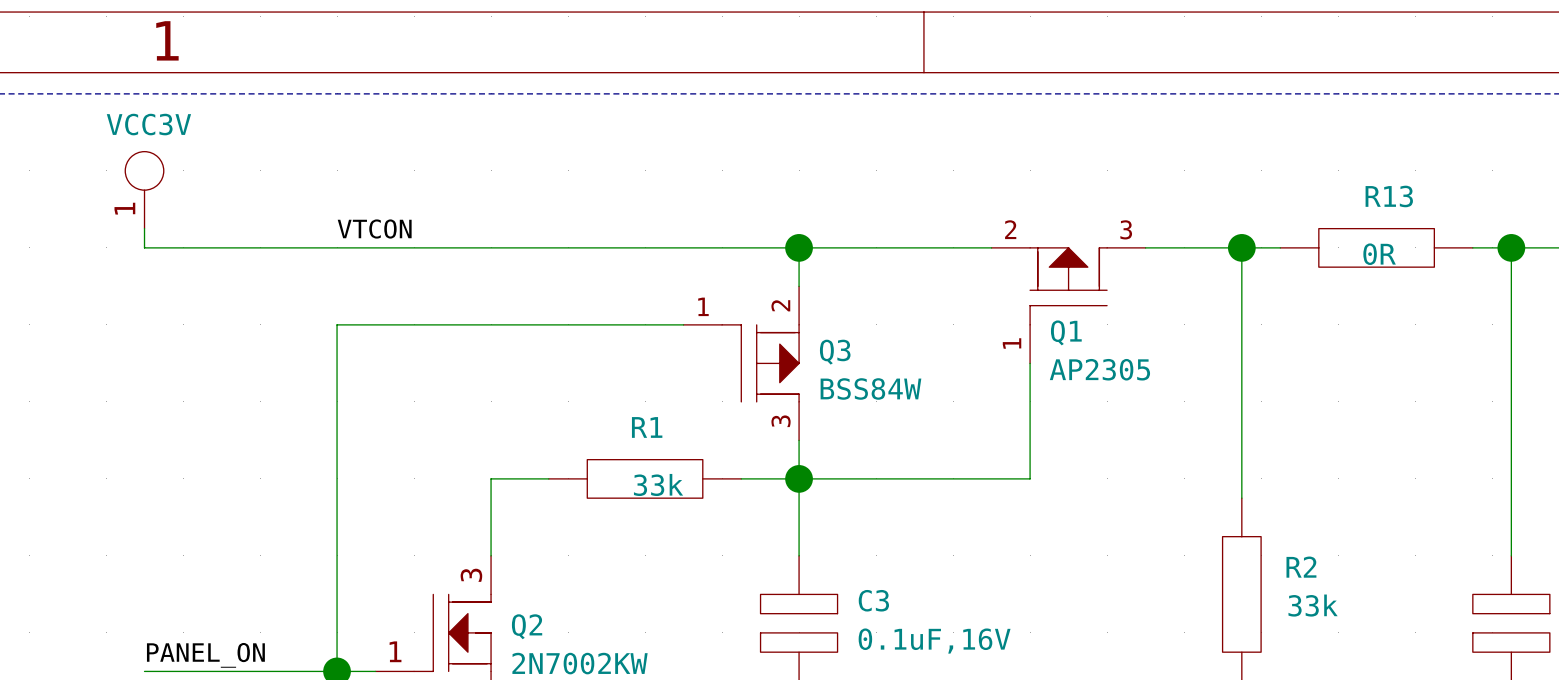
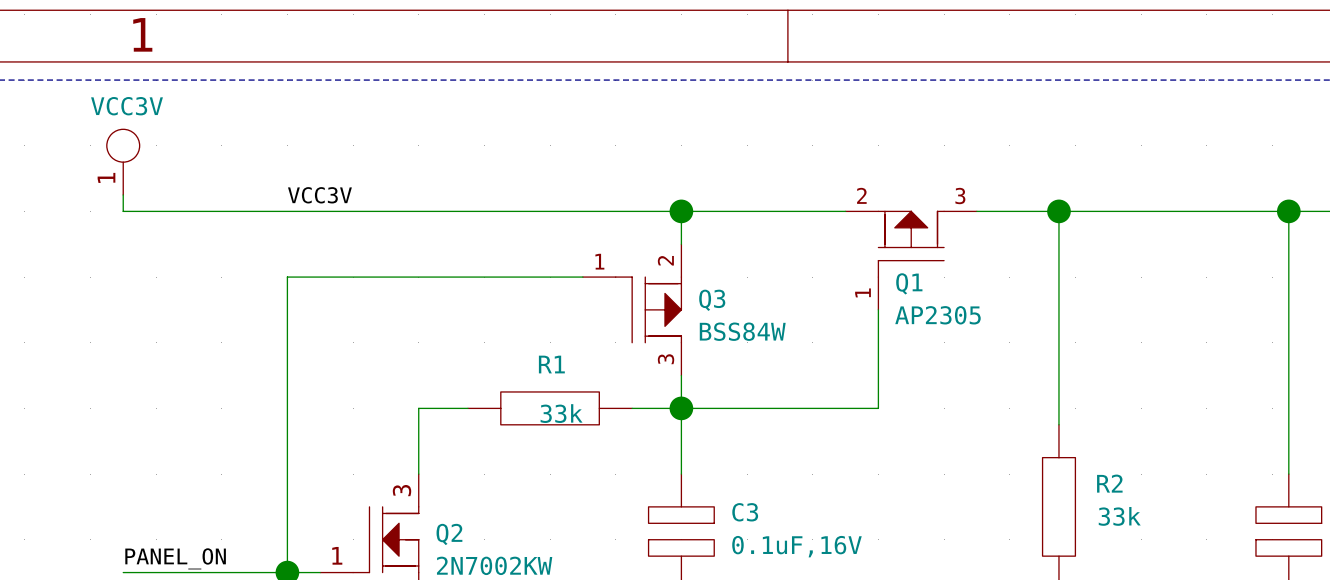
label: VTCON (374, 229) -> VCC3V (319, 195)
wire: none -> (1091, 211) (1255, 211)
R13: 0R (1376, 247) -> none

